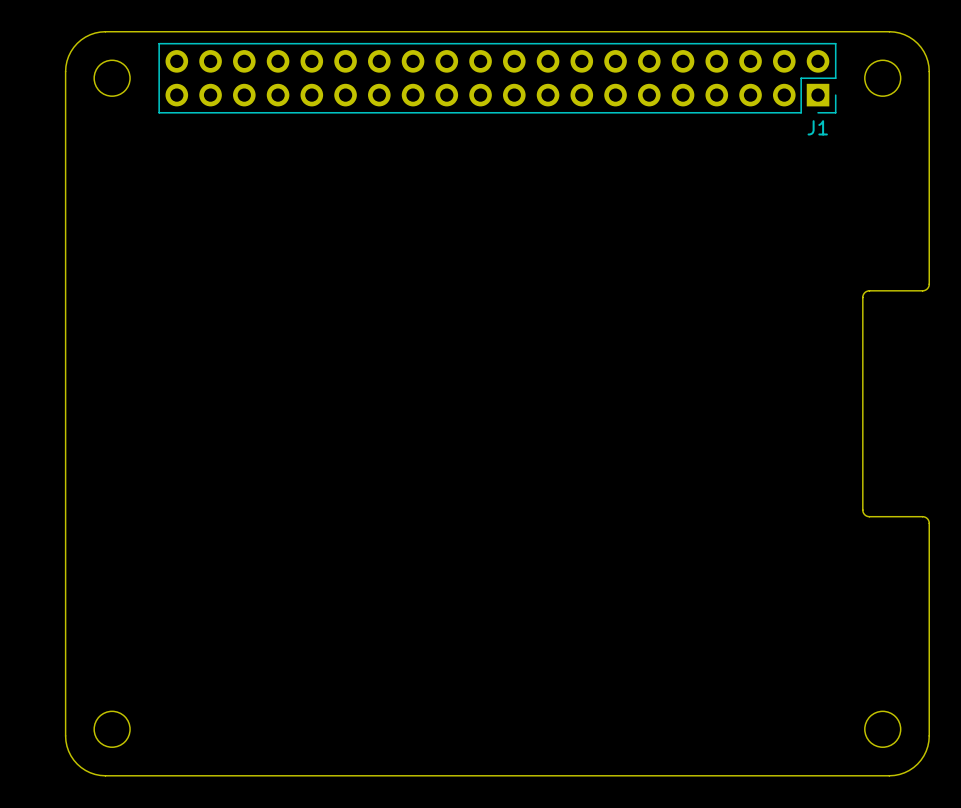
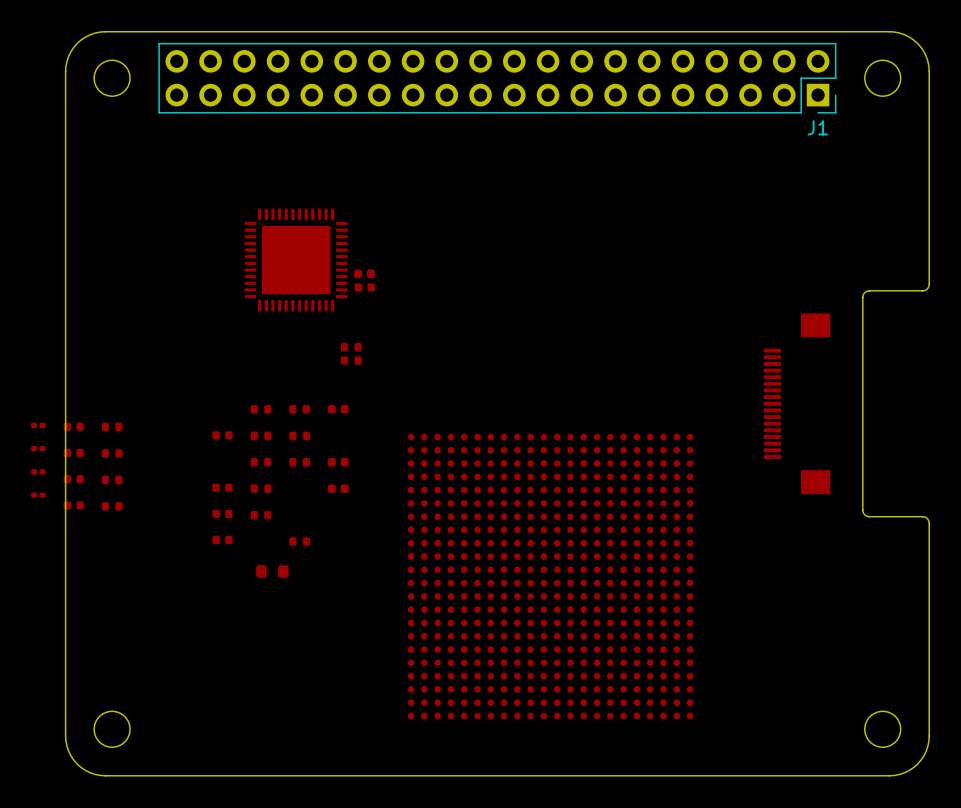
part: none -> (296, 260)
part: none -> (364, 273)
part: none -> (364, 287)
part: none -> (351, 347)
part: none -> (351, 360)
part: none -> (797, 403)
part: none -> (260, 409)
part: none -> (299, 409)
part: none -> (338, 409)
part: none -> (38, 425)
part: none -> (73, 426)
part: none -> (112, 427)
part: none -> (222, 435)
part: none -> (260, 435)
part: none -> (299, 435)
part: none -> (38, 448)
part: none -> (73, 453)
part: none -> (112, 453)
part: none -> (260, 462)
part: none -> (299, 462)
part: none -> (338, 462)
part: none -> (38, 471)
part: none -> (73, 479)
part: none -> (112, 479)
part: none -> (222, 487)
part: none -> (260, 488)
part: none -> (338, 488)
part: none -> (38, 495)
part: none -> (73, 505)
part: none -> (112, 506)
part: none -> (222, 513)
part: none -> (260, 515)
part: none -> (222, 540)
part: none -> (299, 541)
part: none -> (272, 571)
part: none -> (550, 576)

